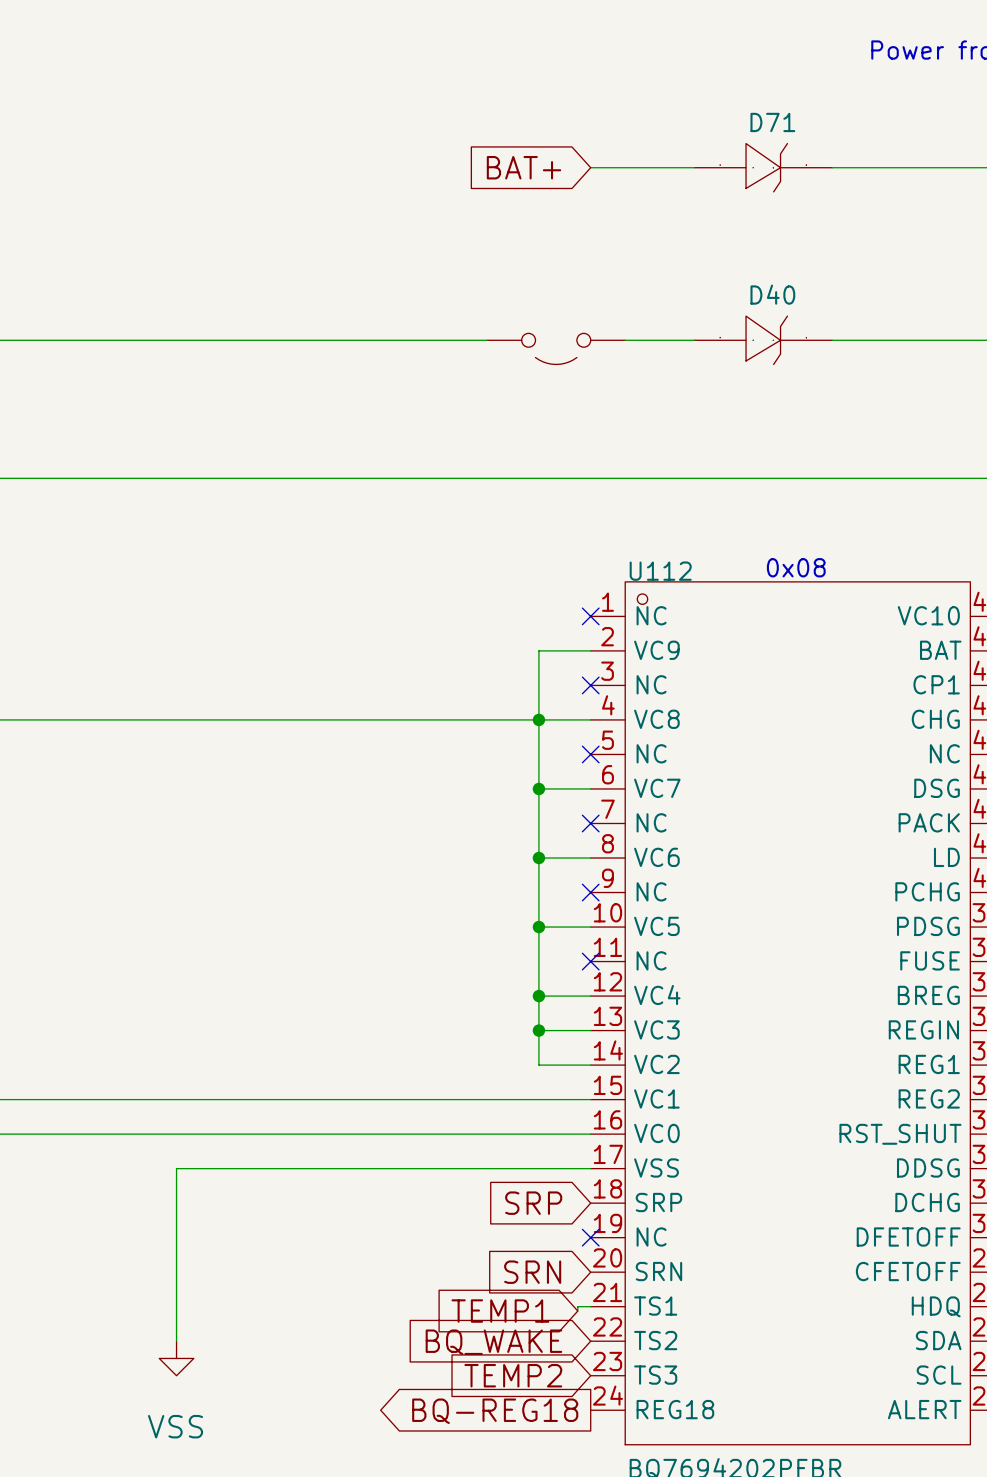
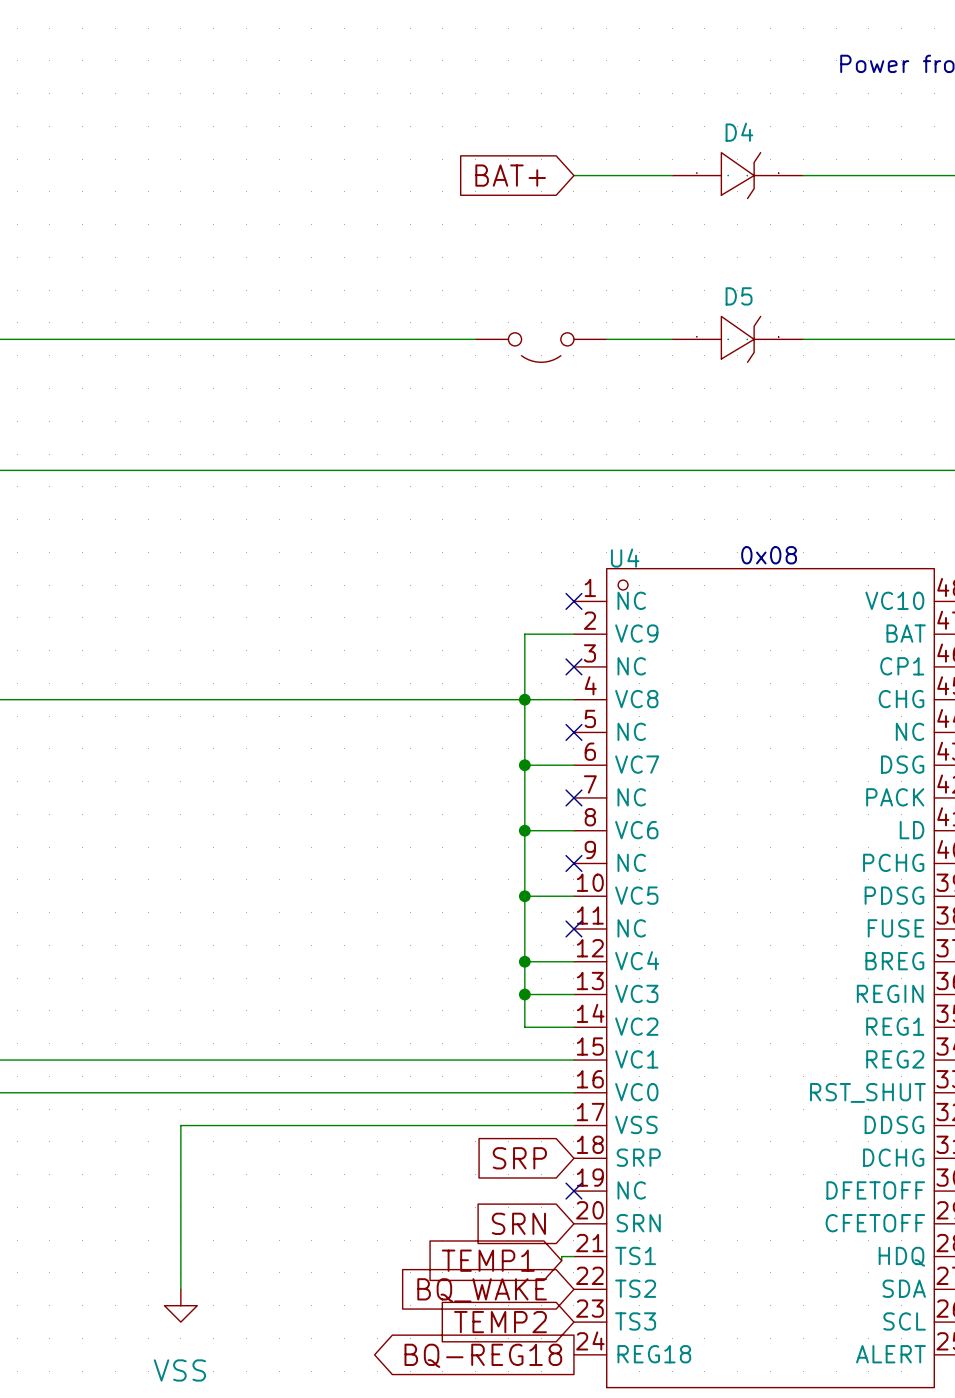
D71 name: D71 (772, 122) -> D4 (739, 132)
D40 name: D40 (772, 294) -> D5 (739, 296)
U112 name: U112 (660, 571) -> U4 (625, 558)

